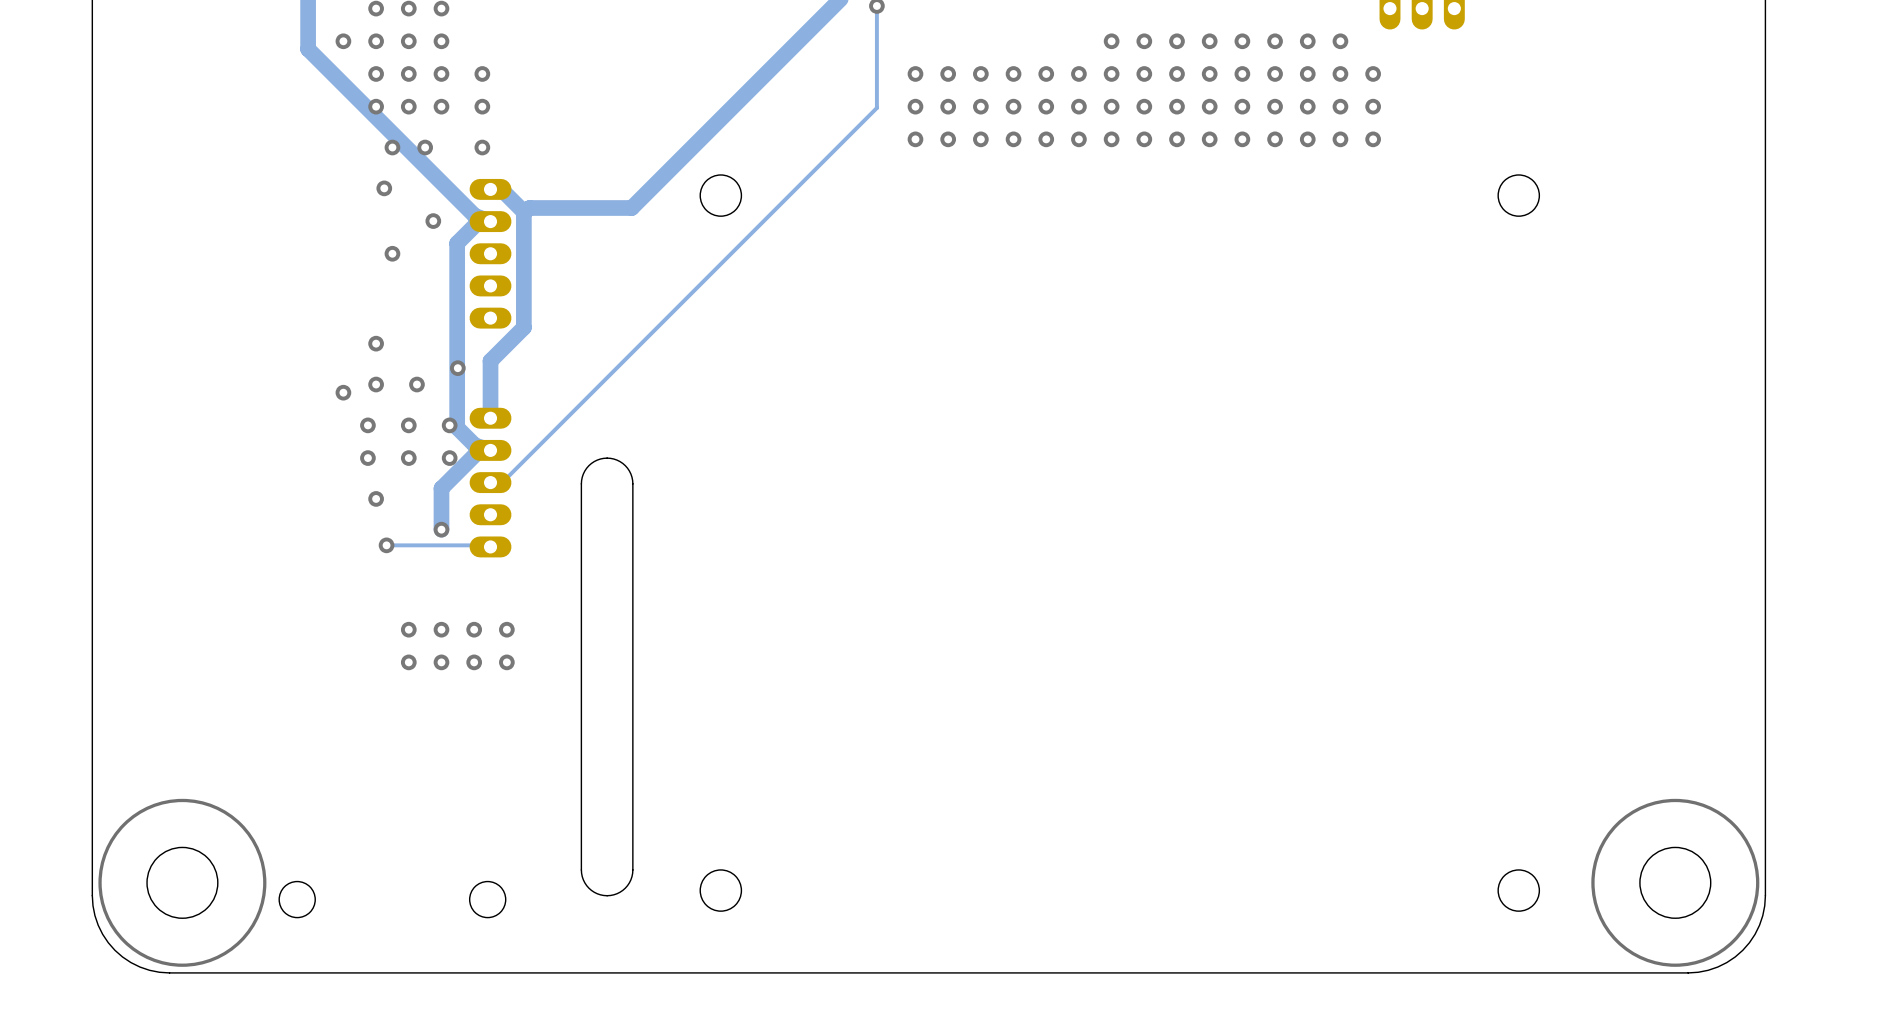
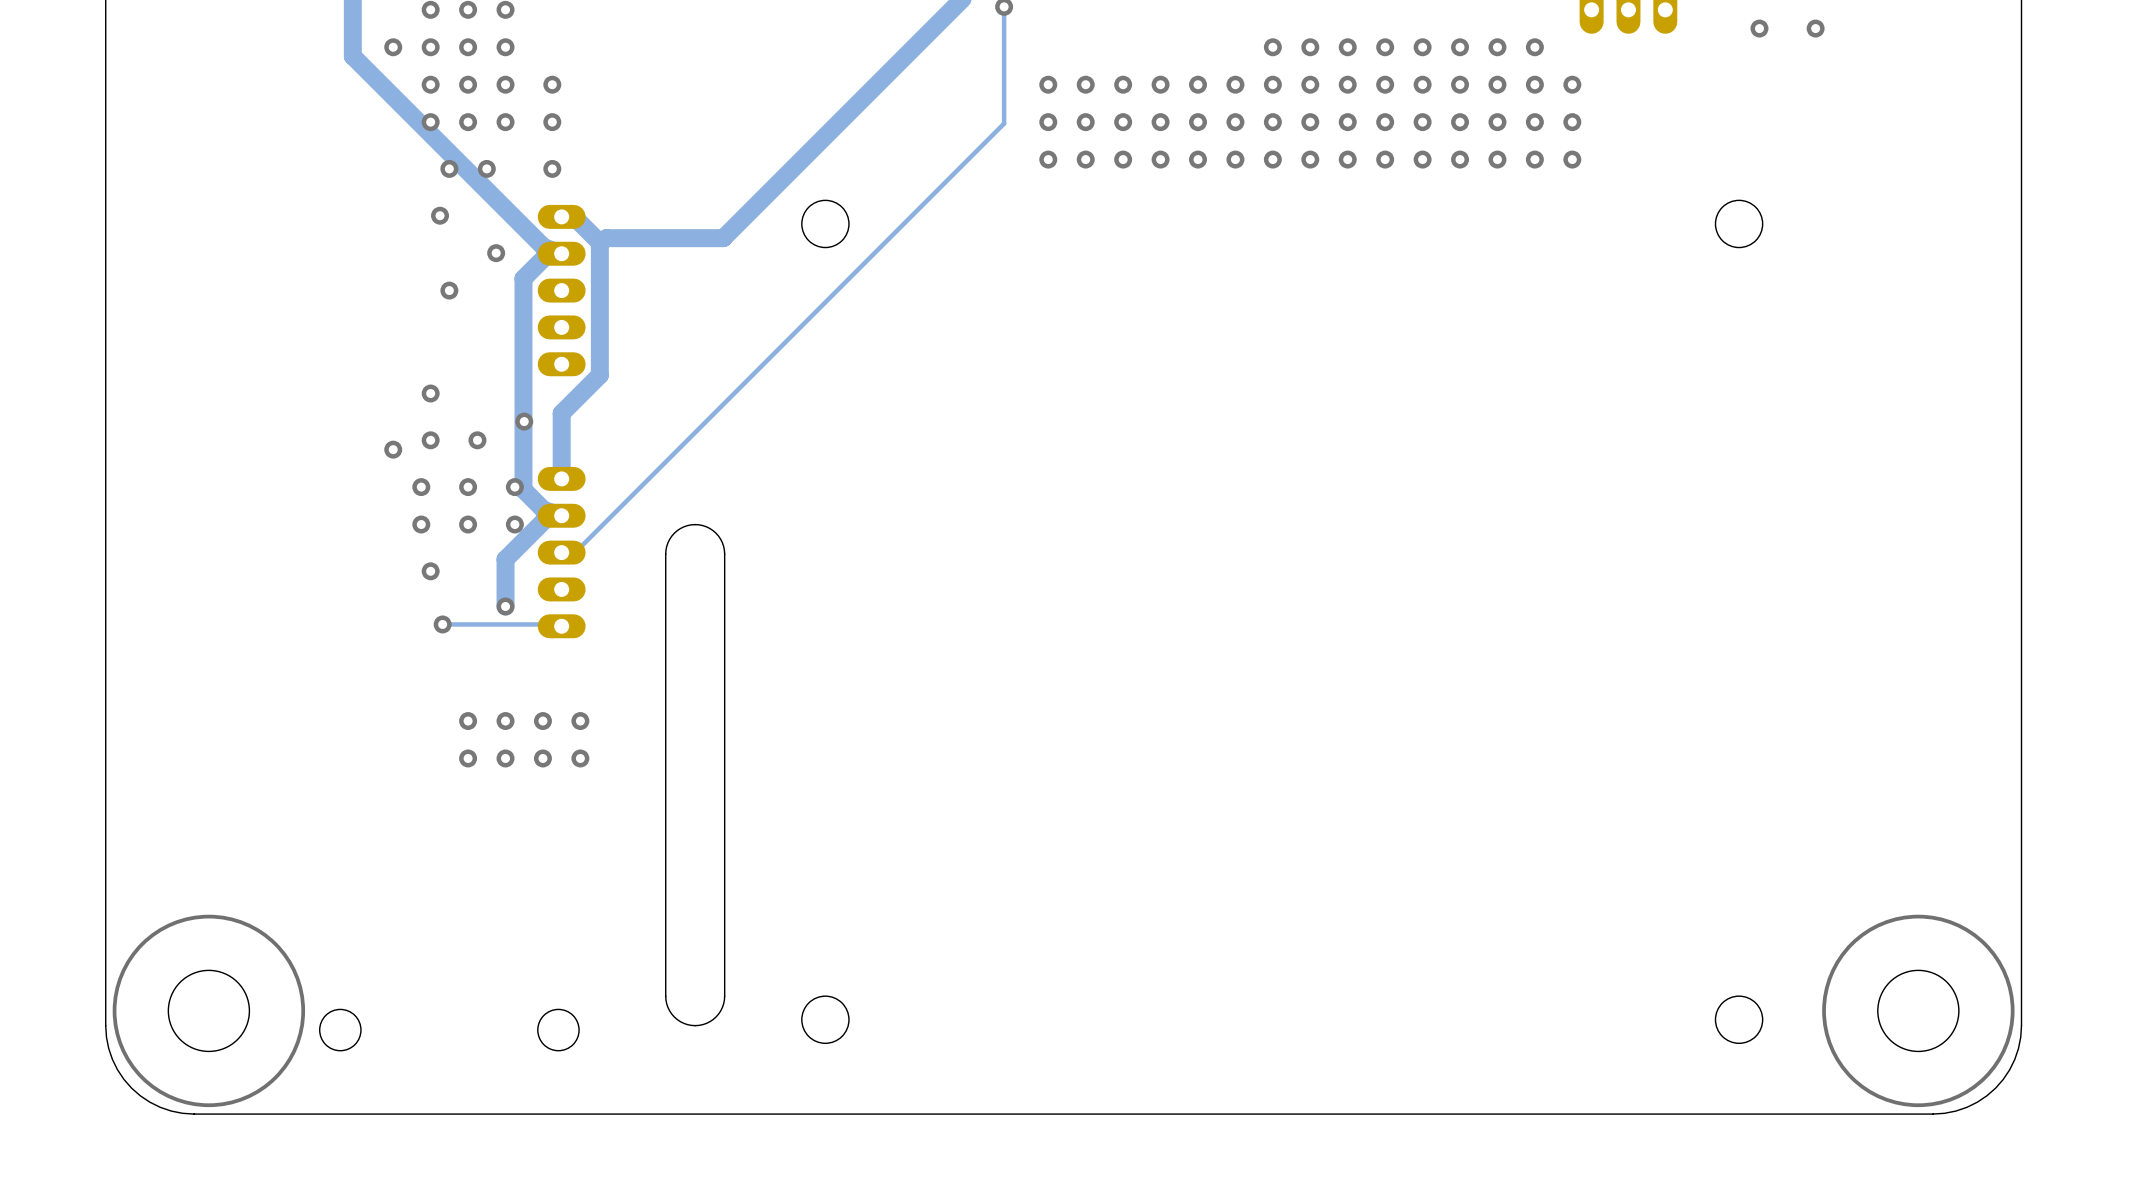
via: none -> (1759, 28)
via: none -> (1815, 28)

